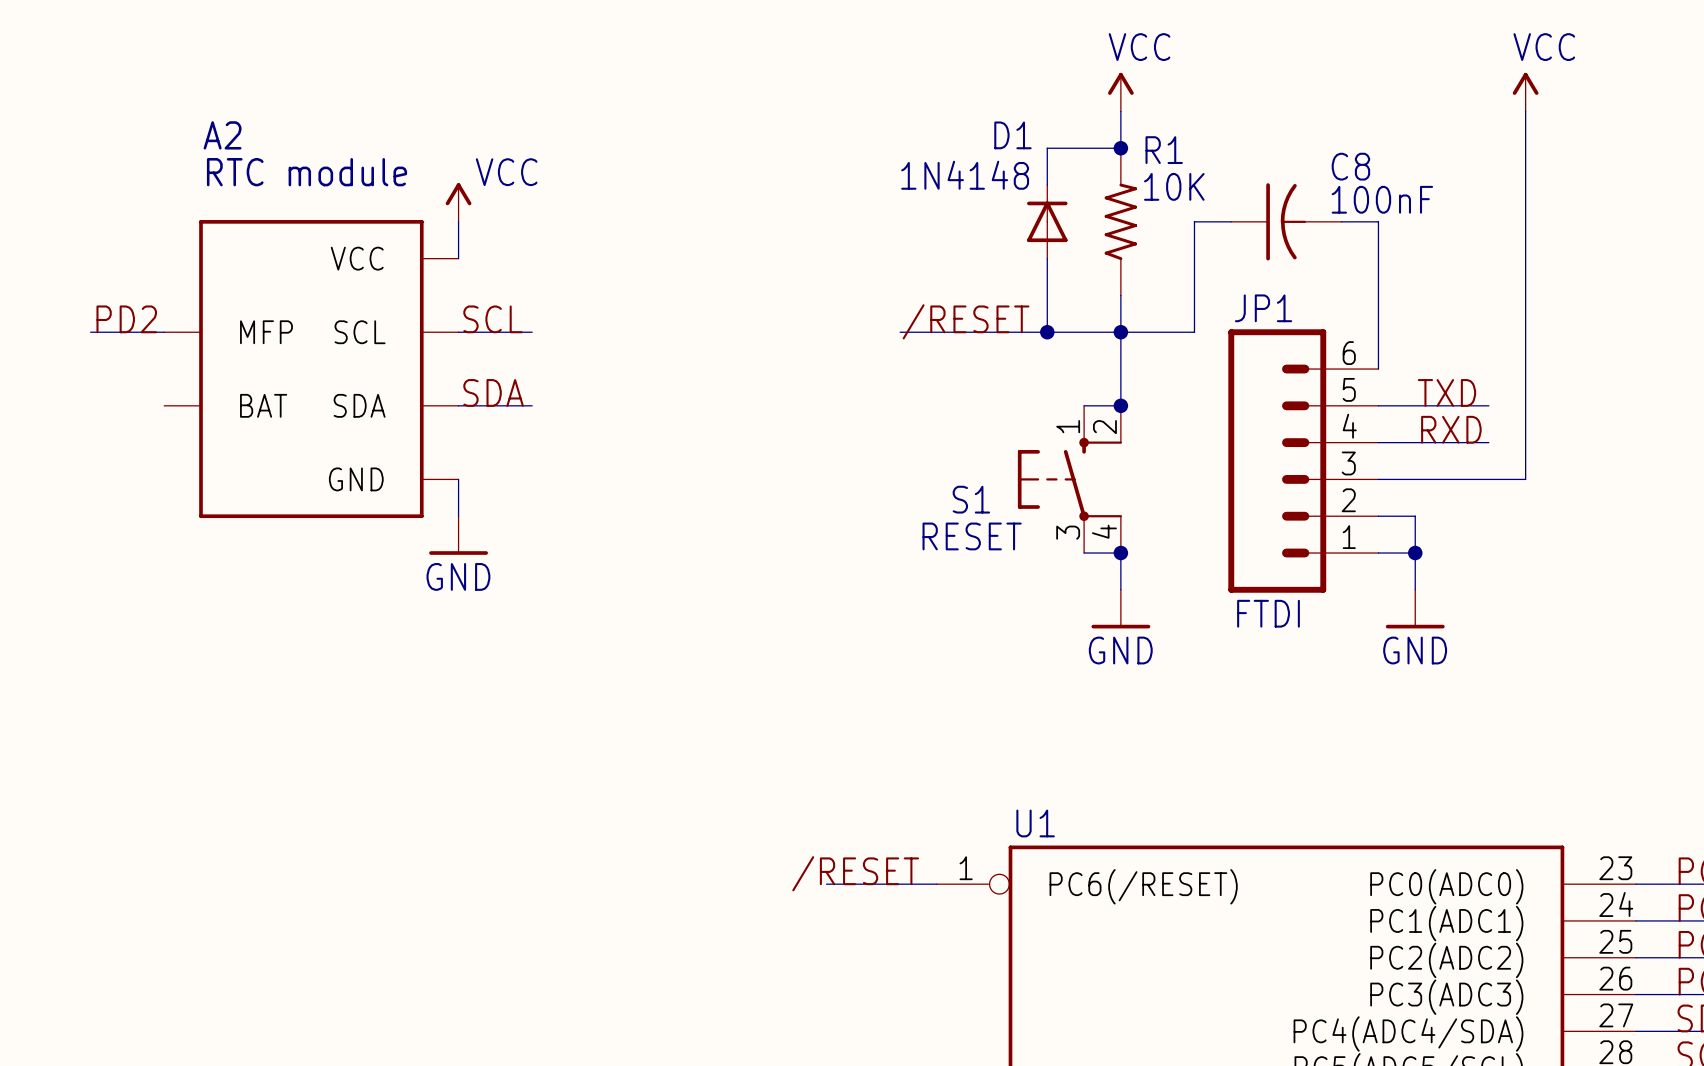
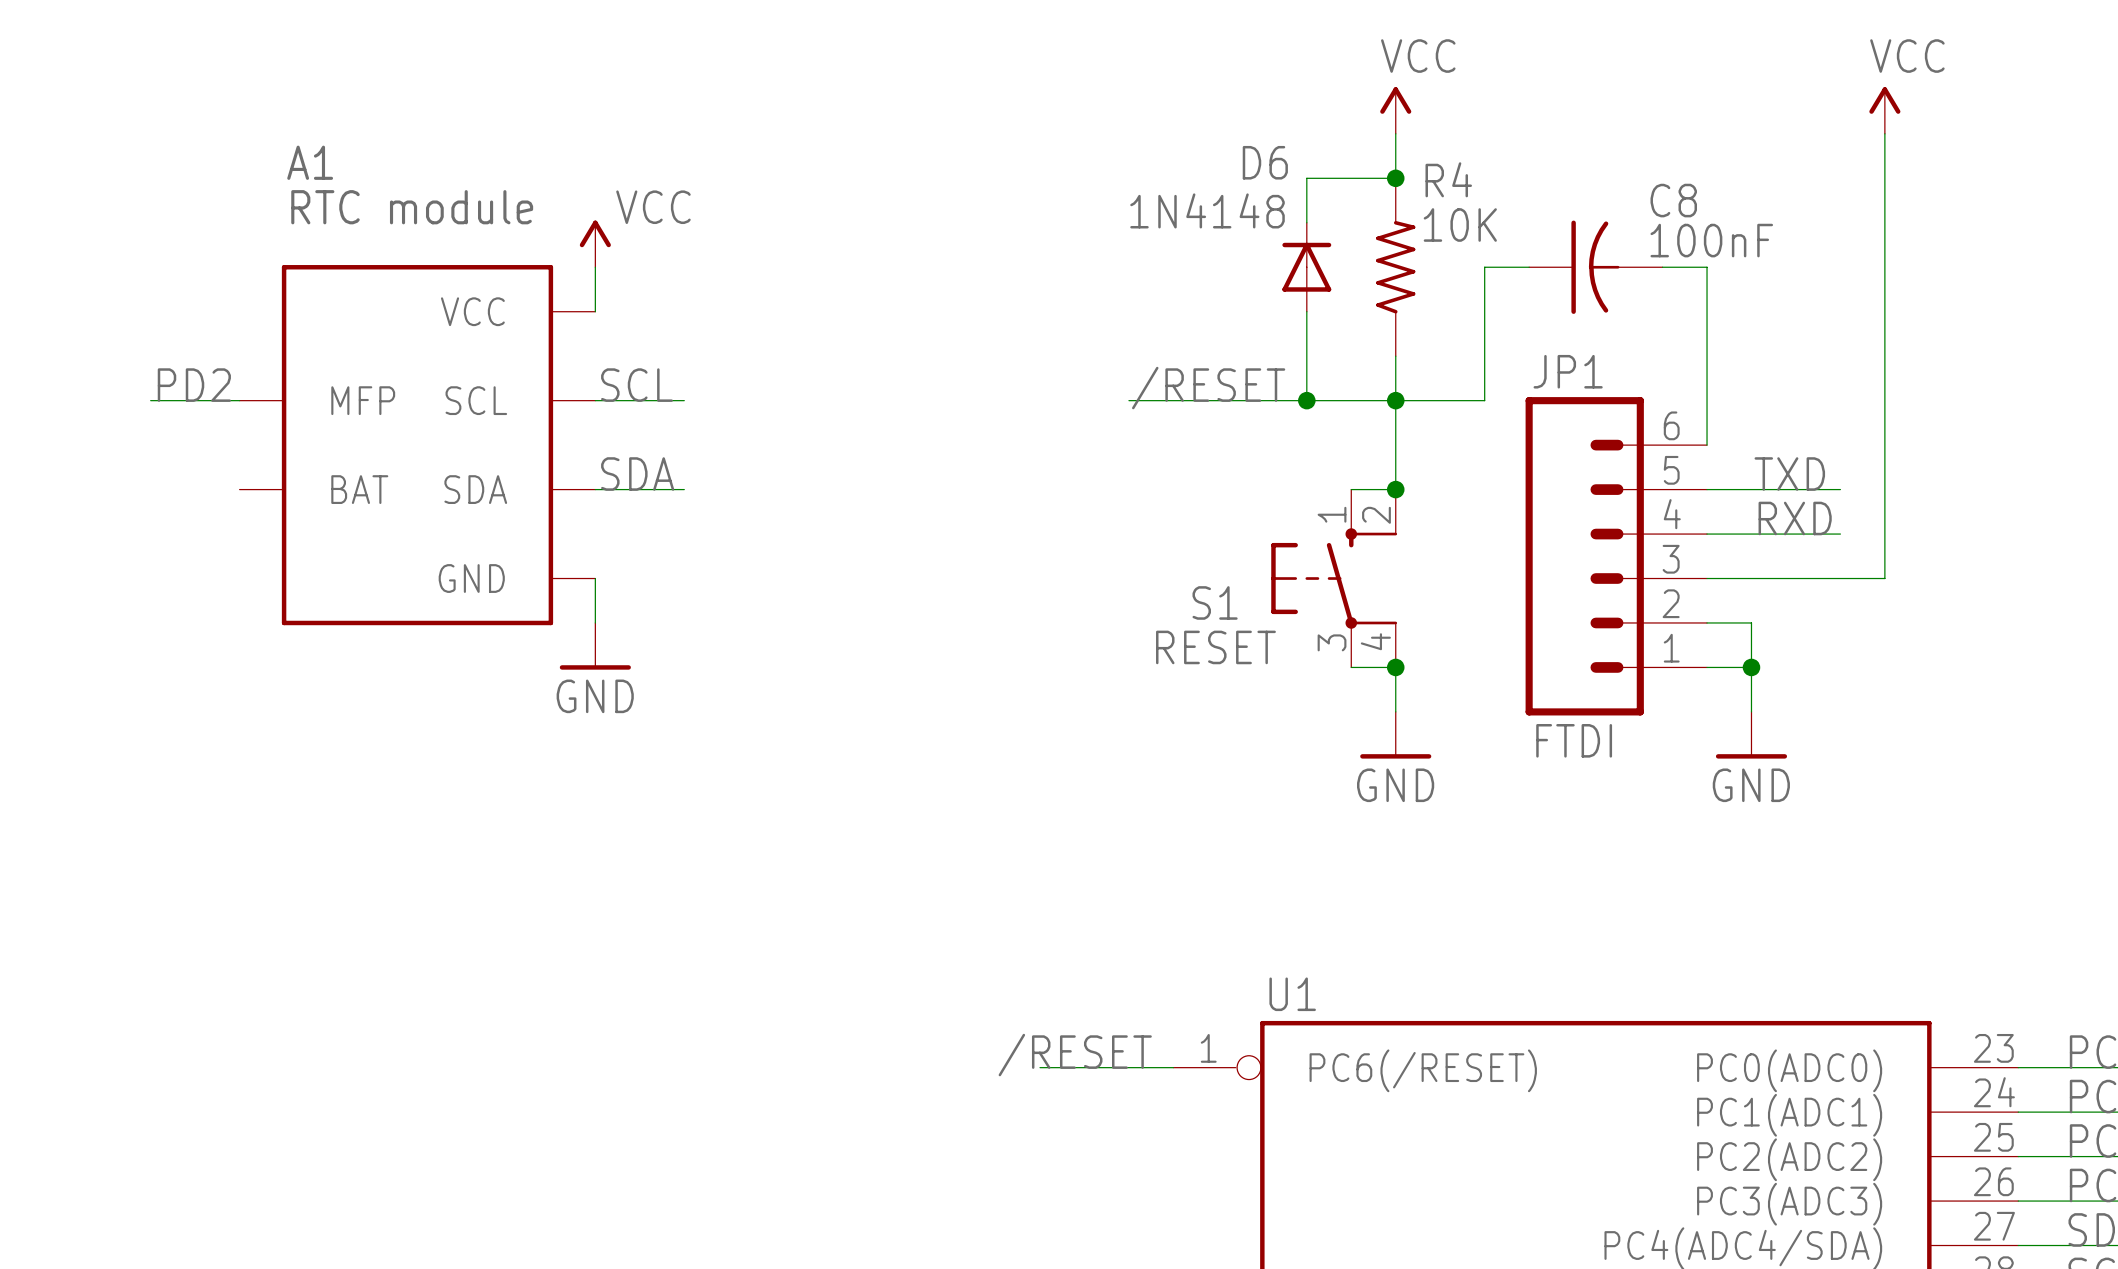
A2 name: A2 (222, 135) -> A1 (310, 162)
D1 name: D1 (1012, 135) -> D6 (1265, 162)
R1 name: R1 (1164, 150) -> R4 (1448, 179)

